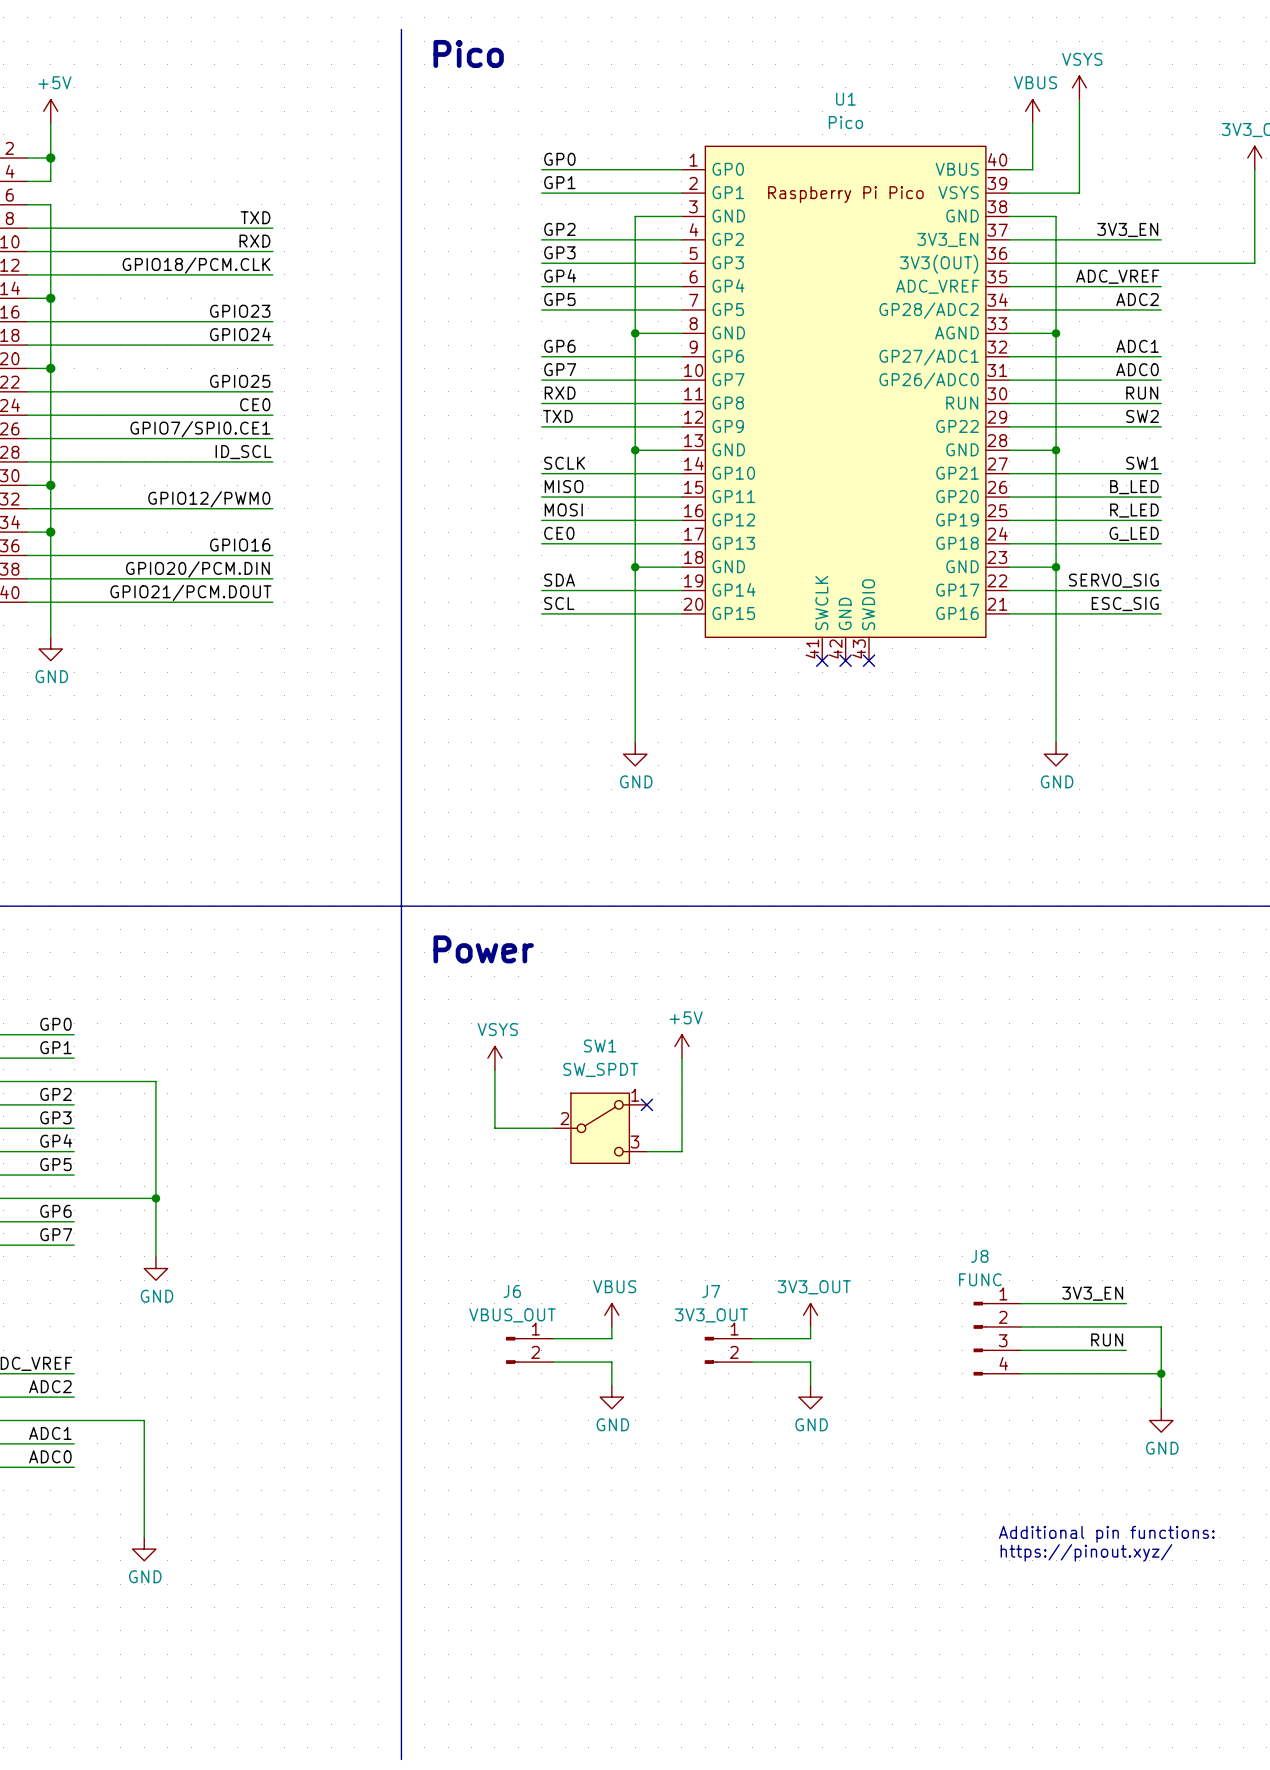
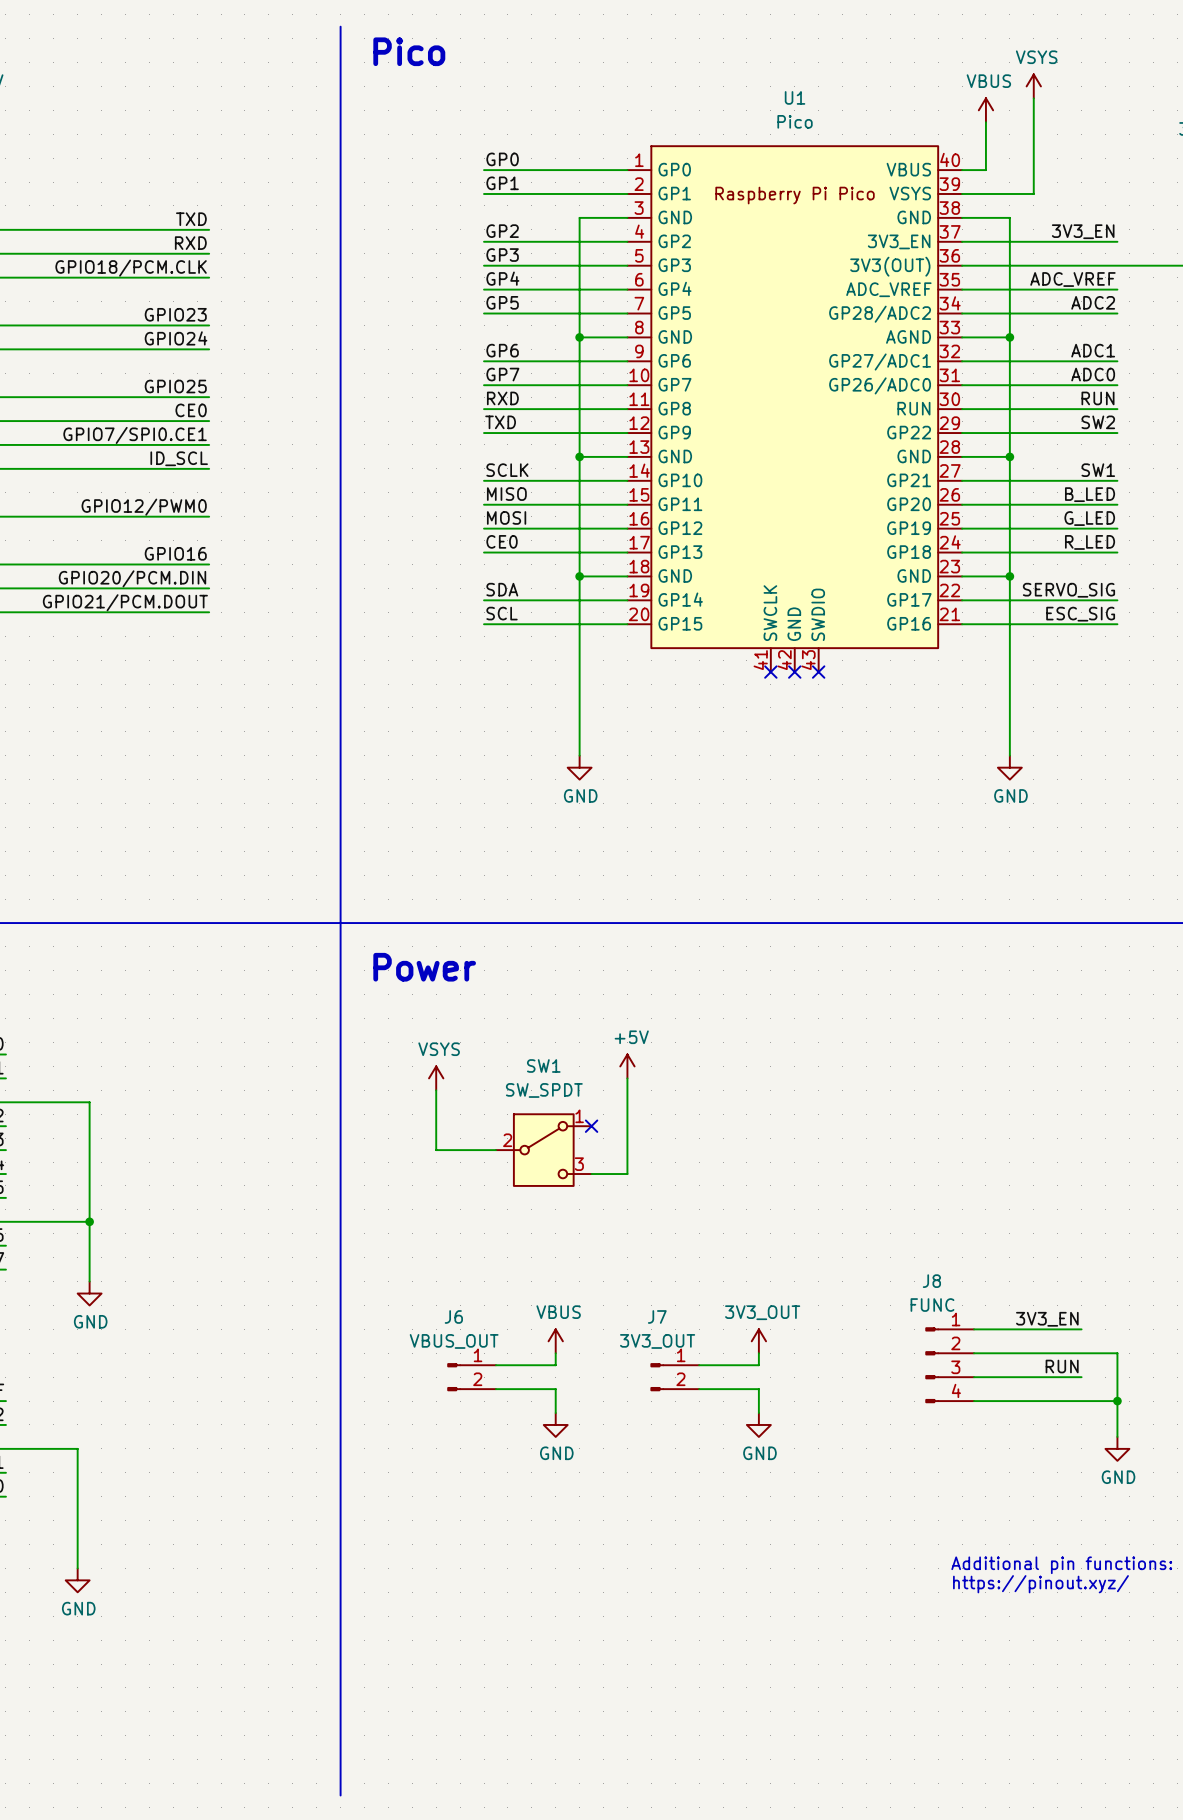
label: R_LED (1134, 510) -> G_LED (1089, 518)
label: G_LED (1134, 533) -> R_LED (1090, 542)

